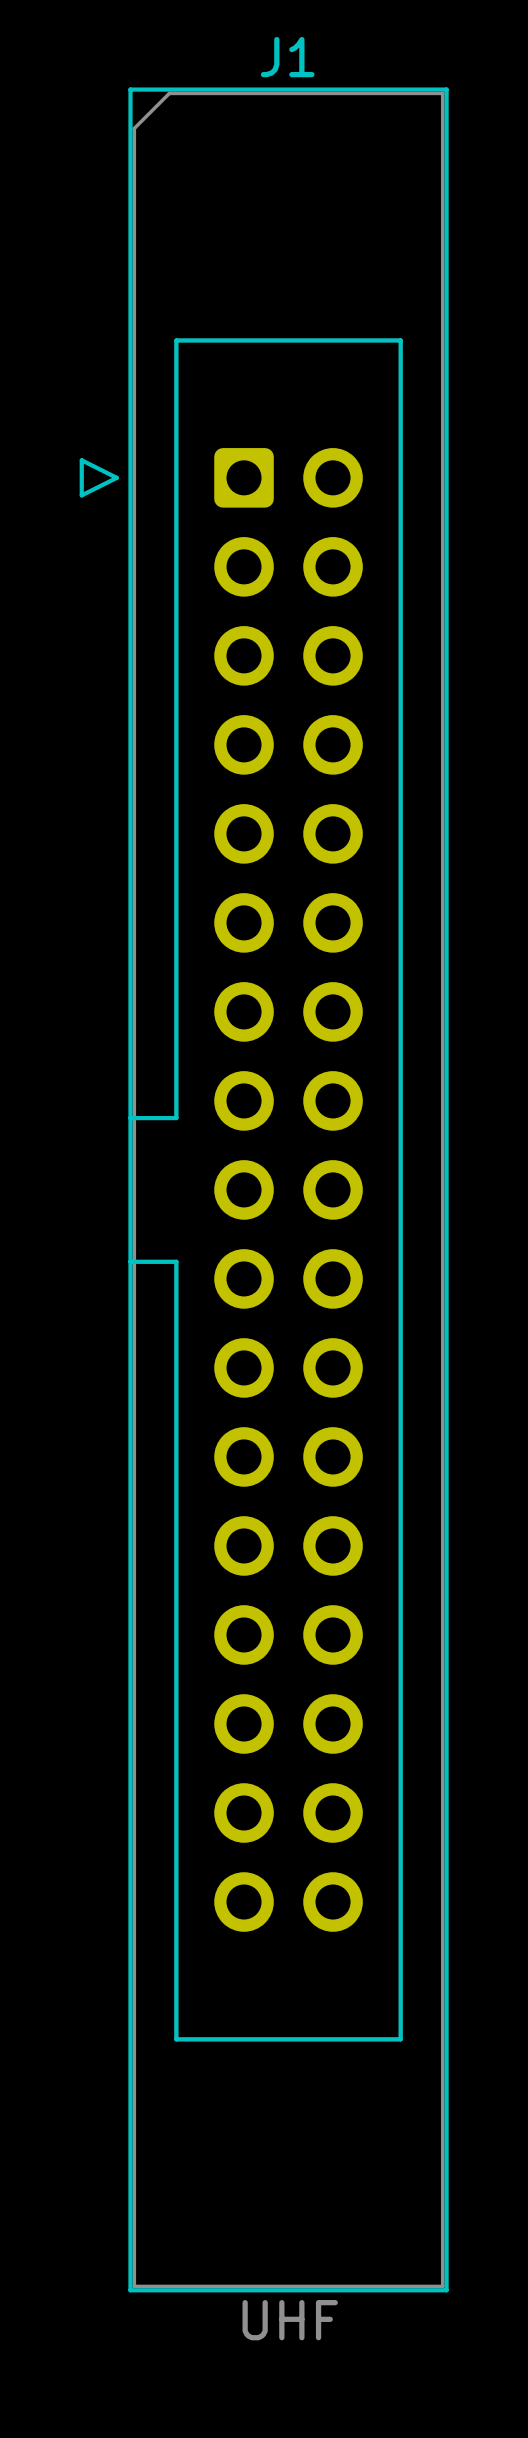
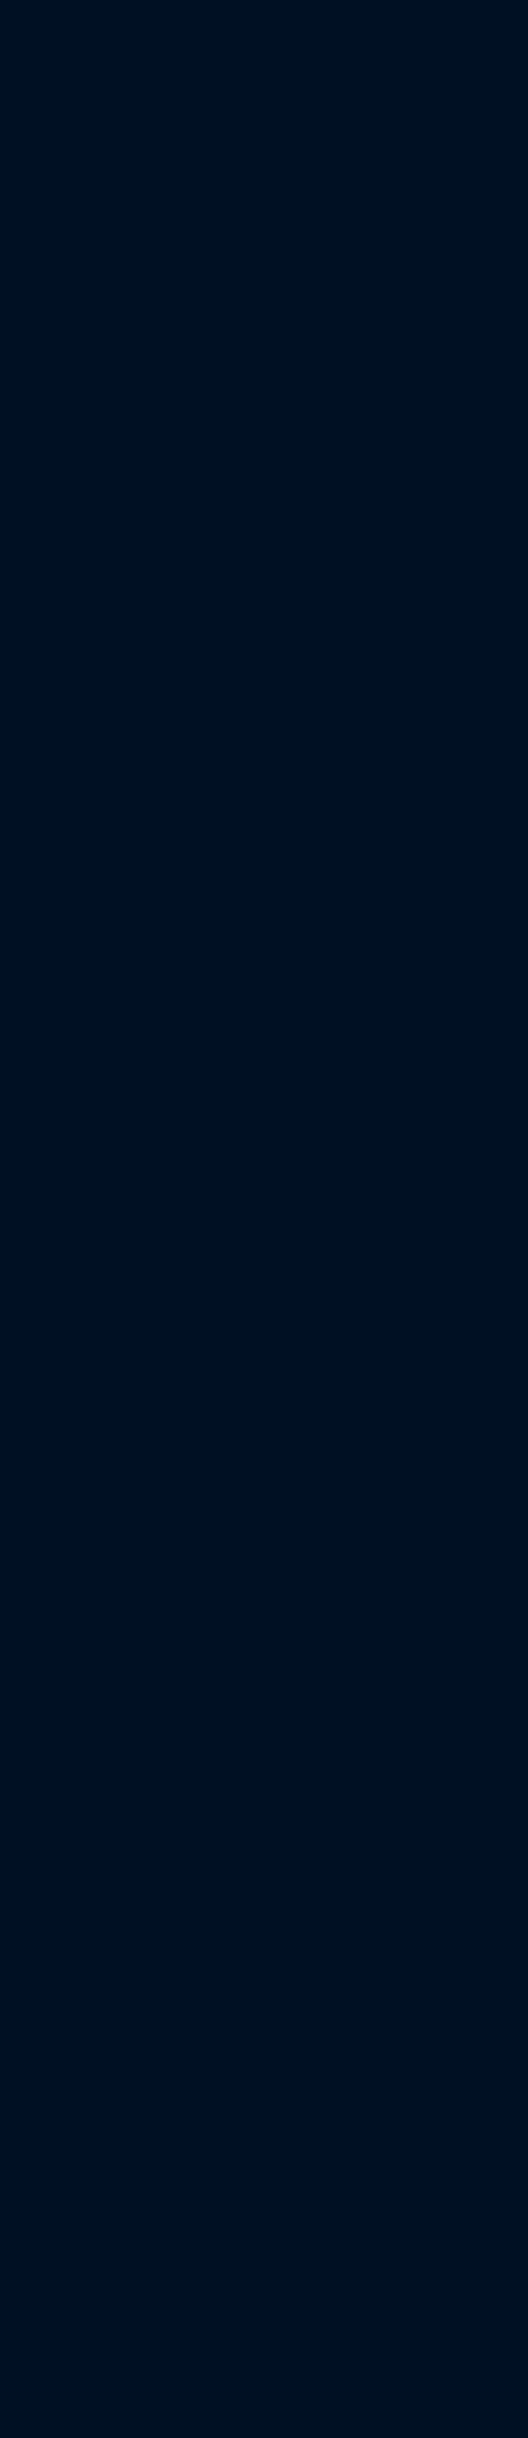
J1: UHF (264, 1189) -> none

